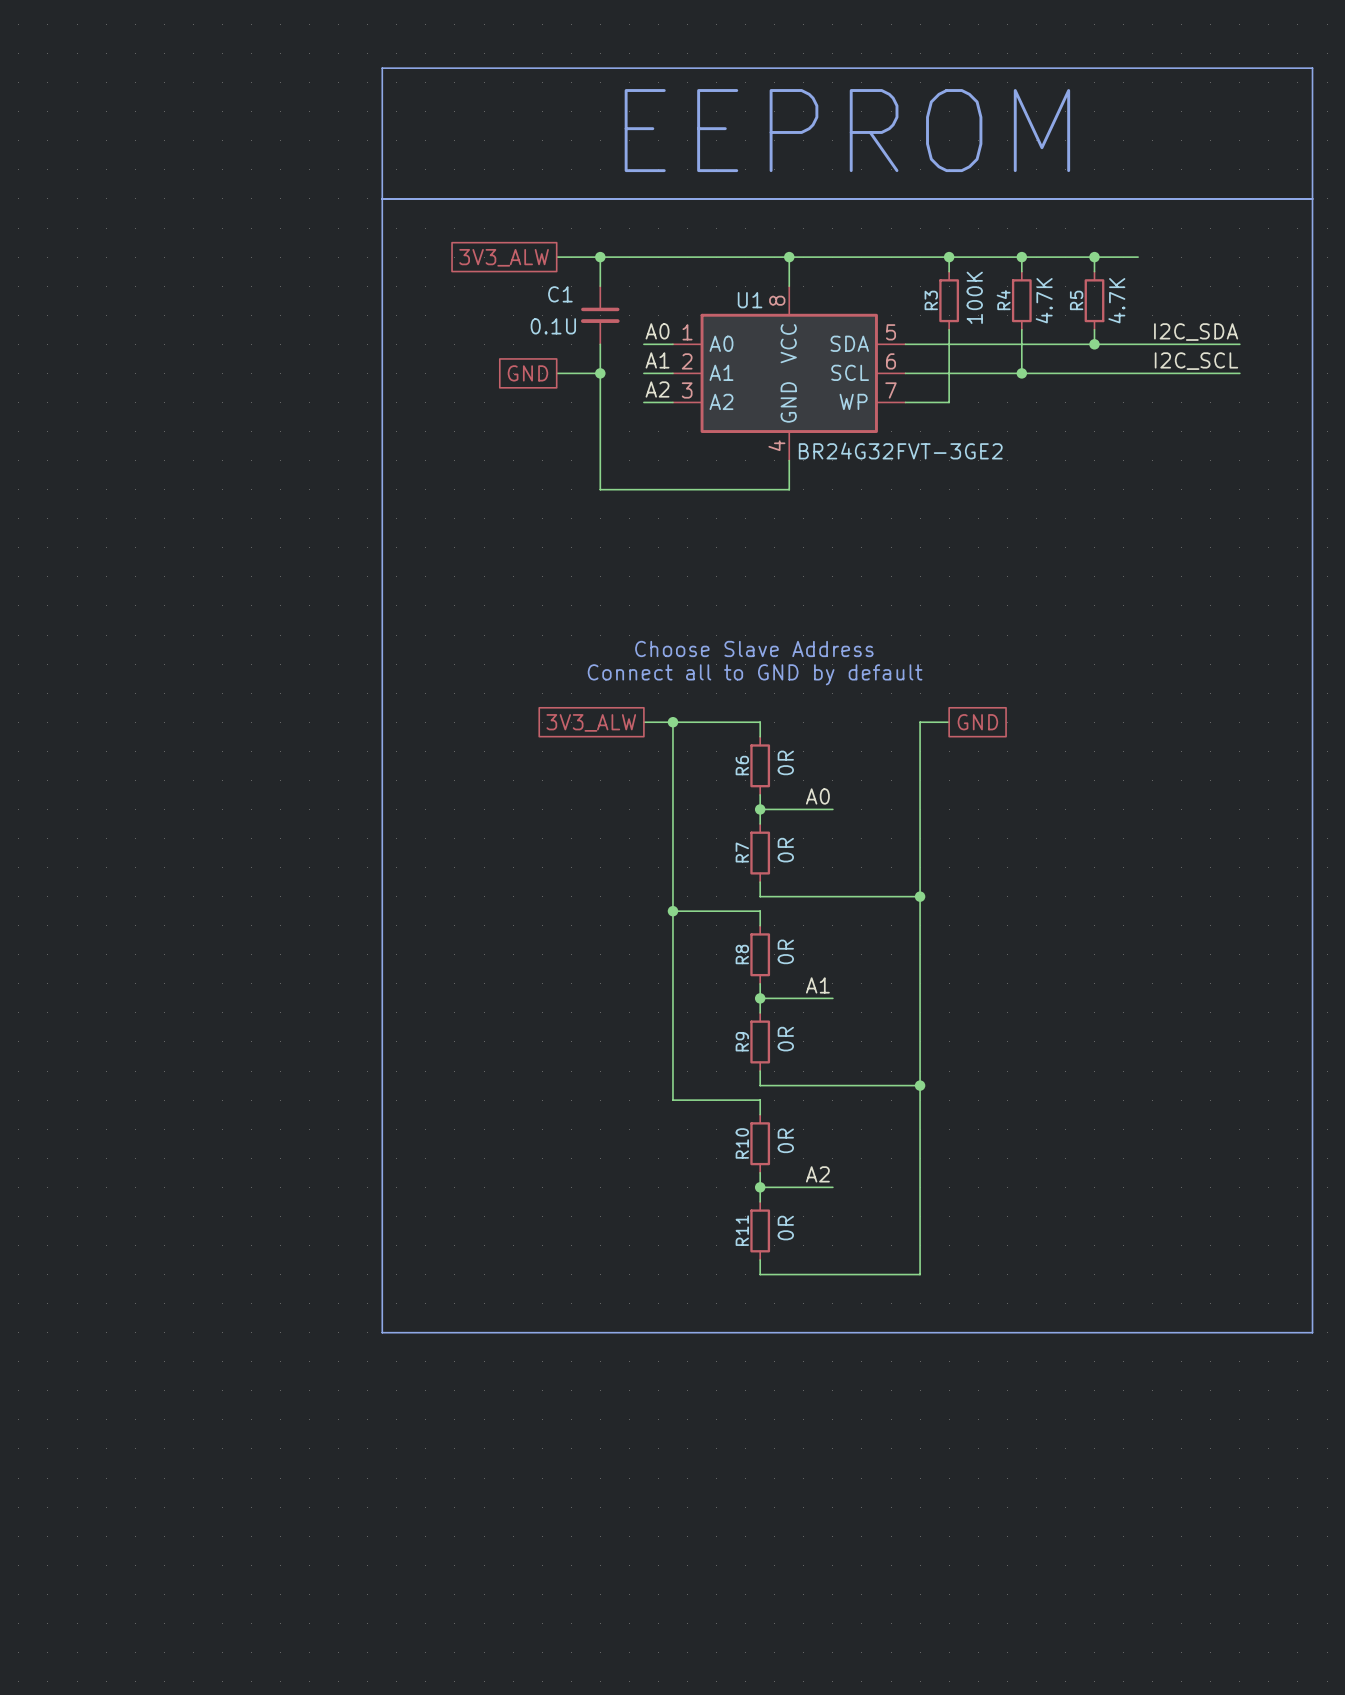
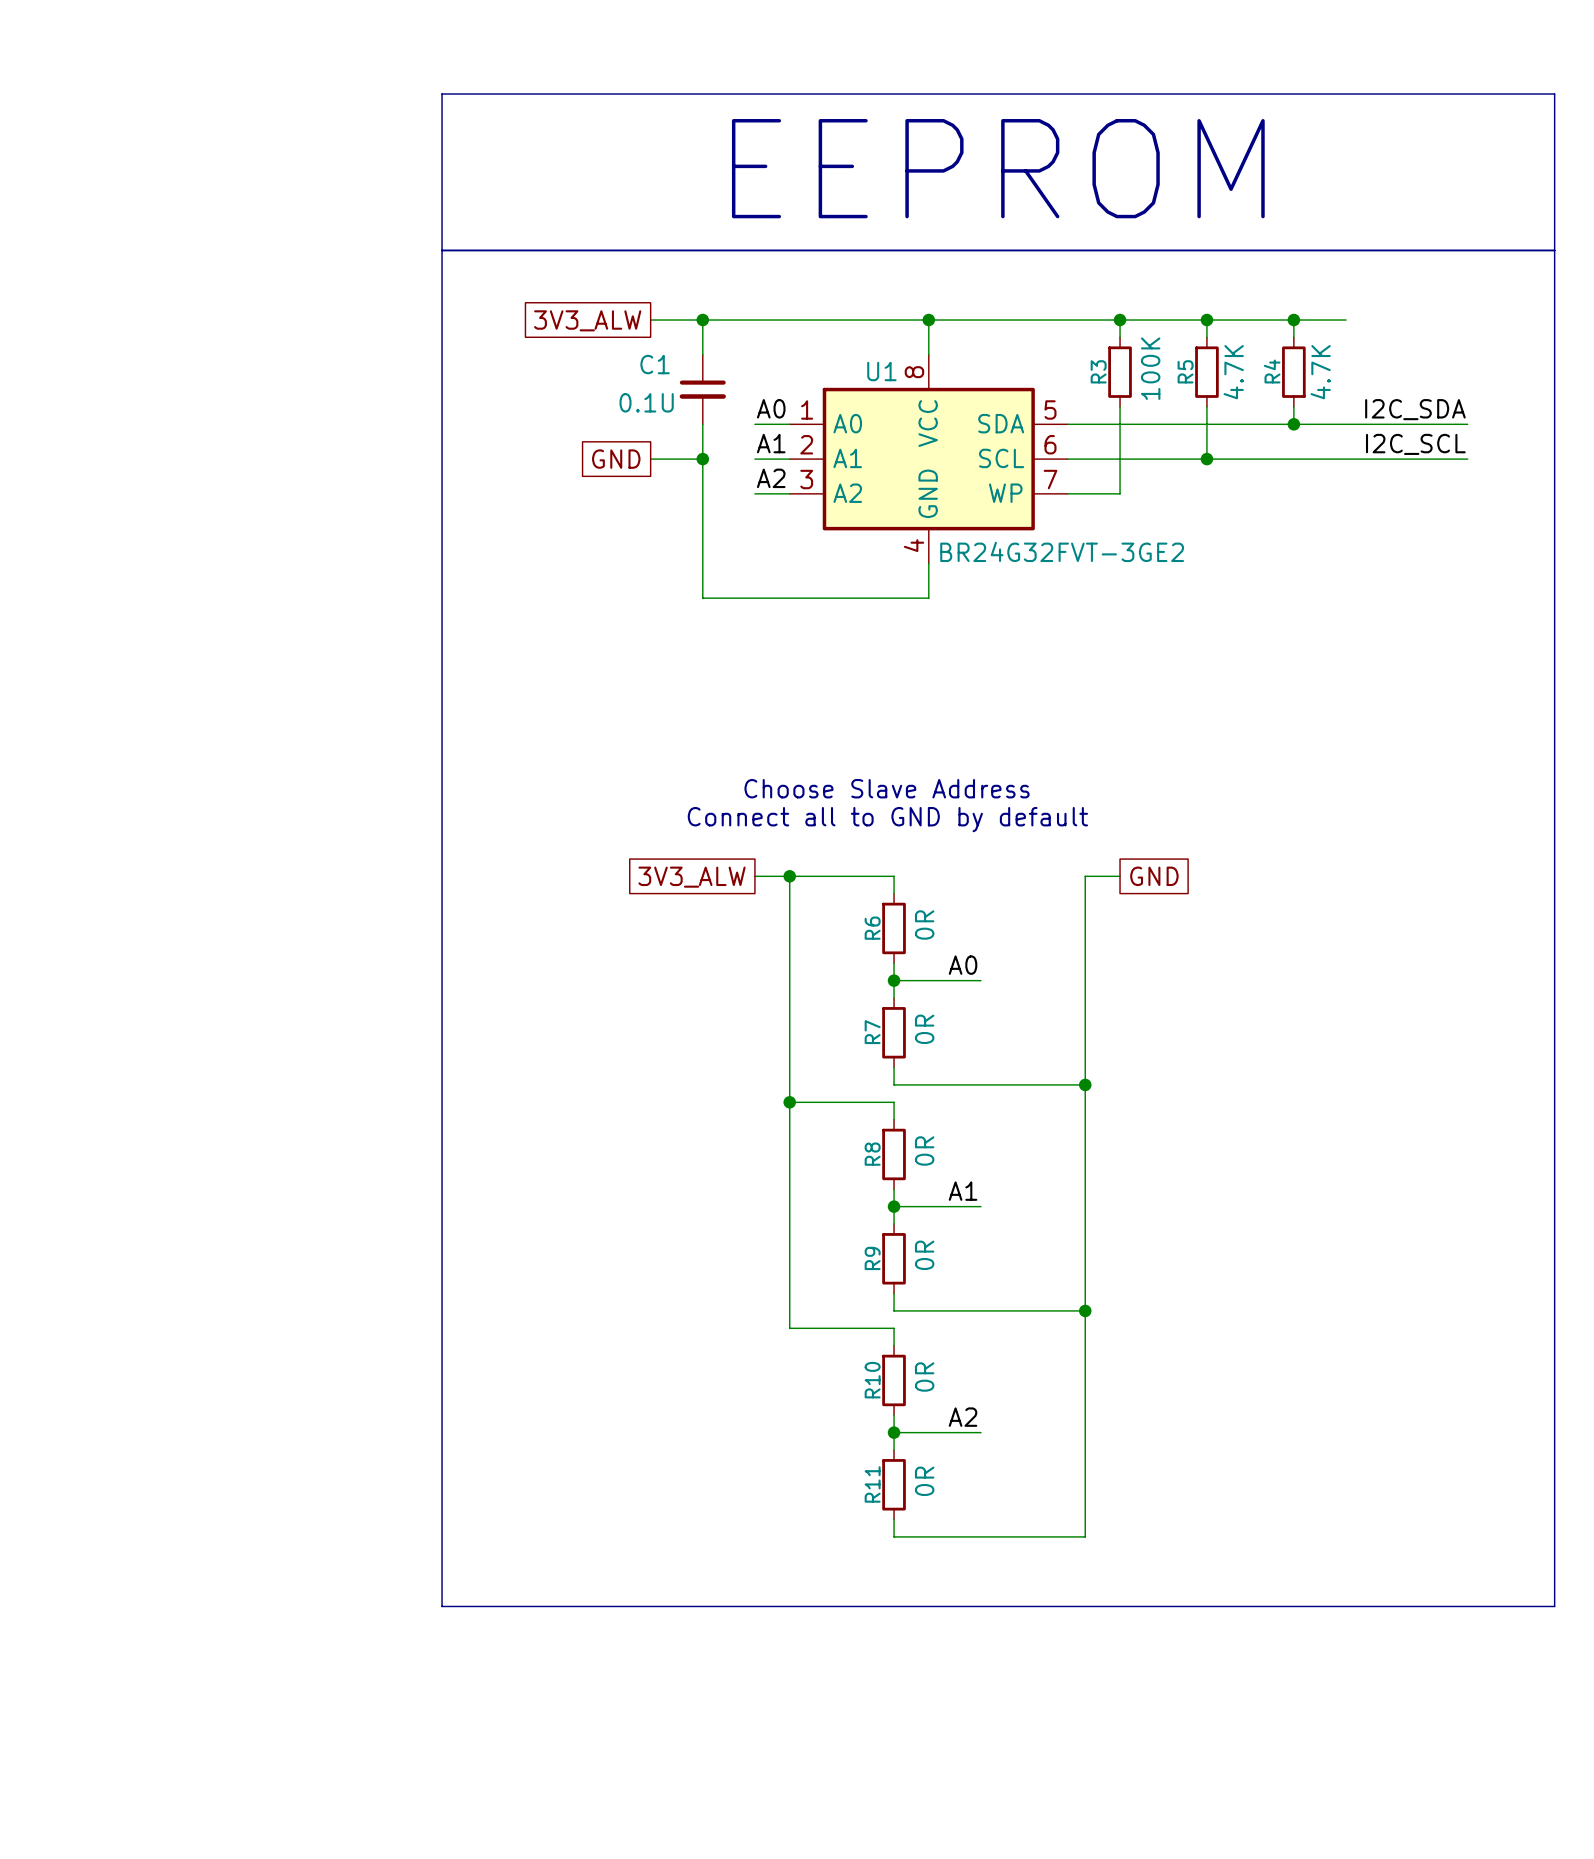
R4 name: R4 (1003, 300) -> R5 (1185, 371)
R5 name: R5 (1076, 300) -> R4 (1272, 371)

